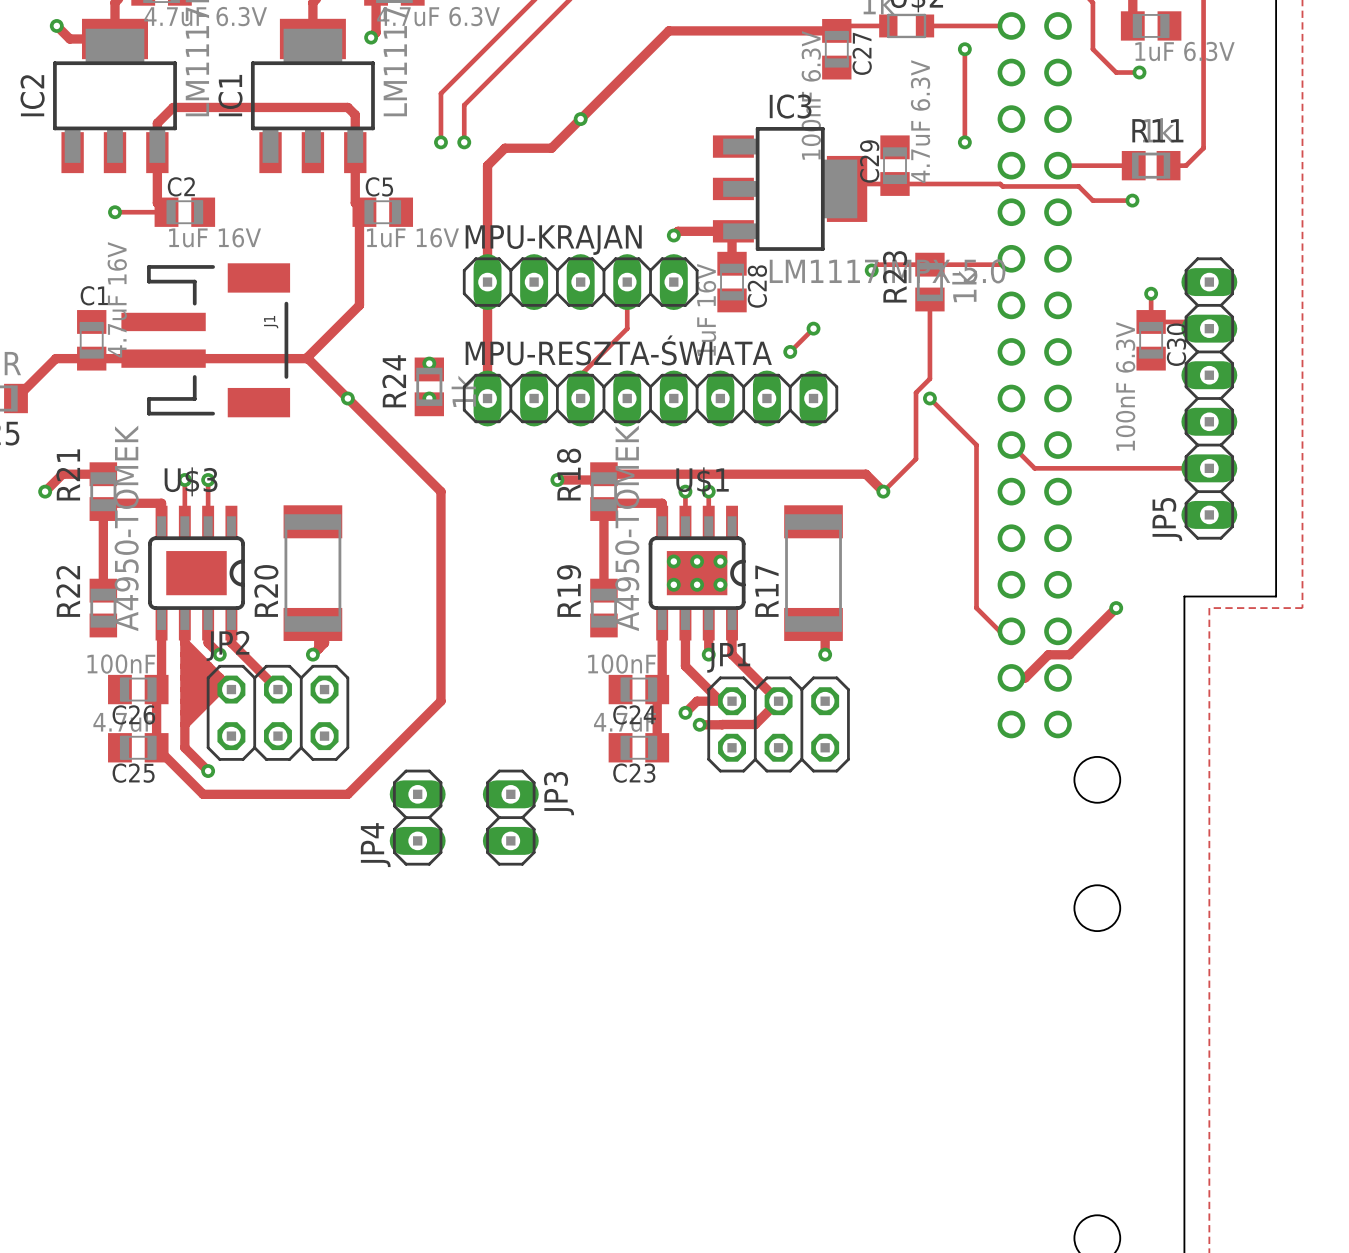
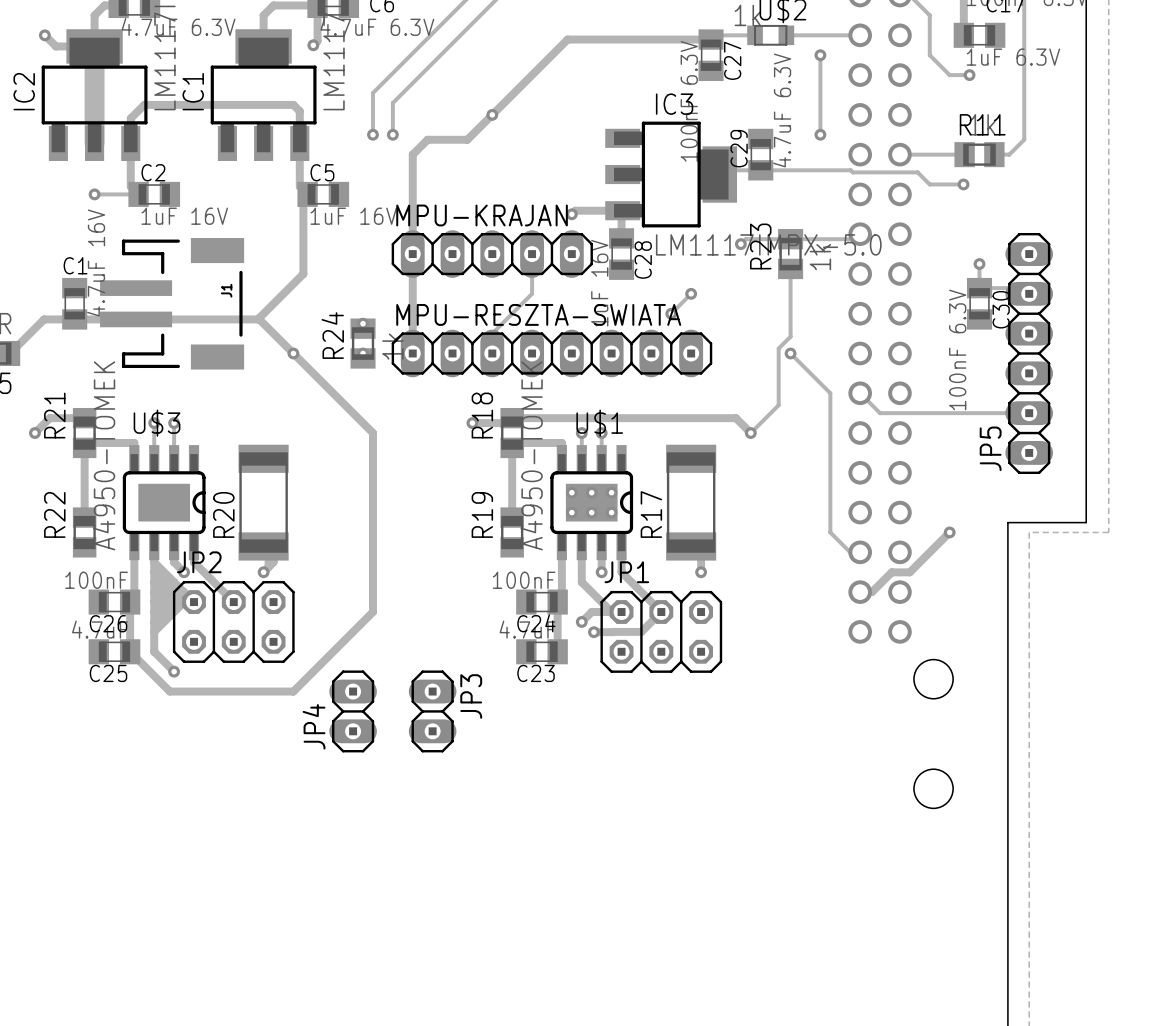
track: none -> (94, 46) (94, 143)
MPU-RESZTA-ŚWIATA name: MPU-RESZTA-ŚWIATA (618, 350) -> MPU-RESZTA-SWIATA (538, 314)

